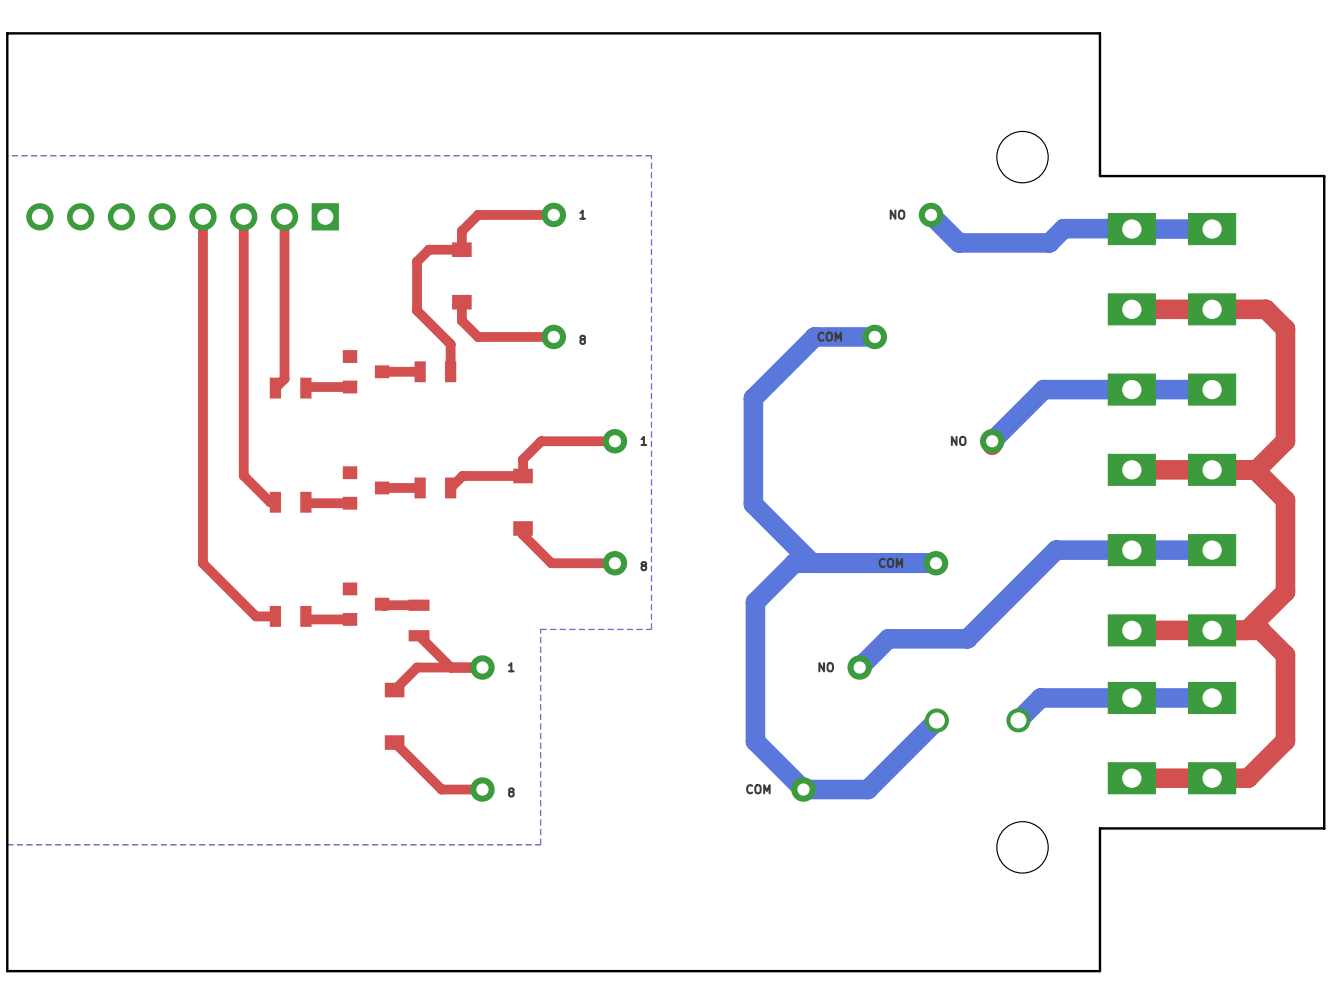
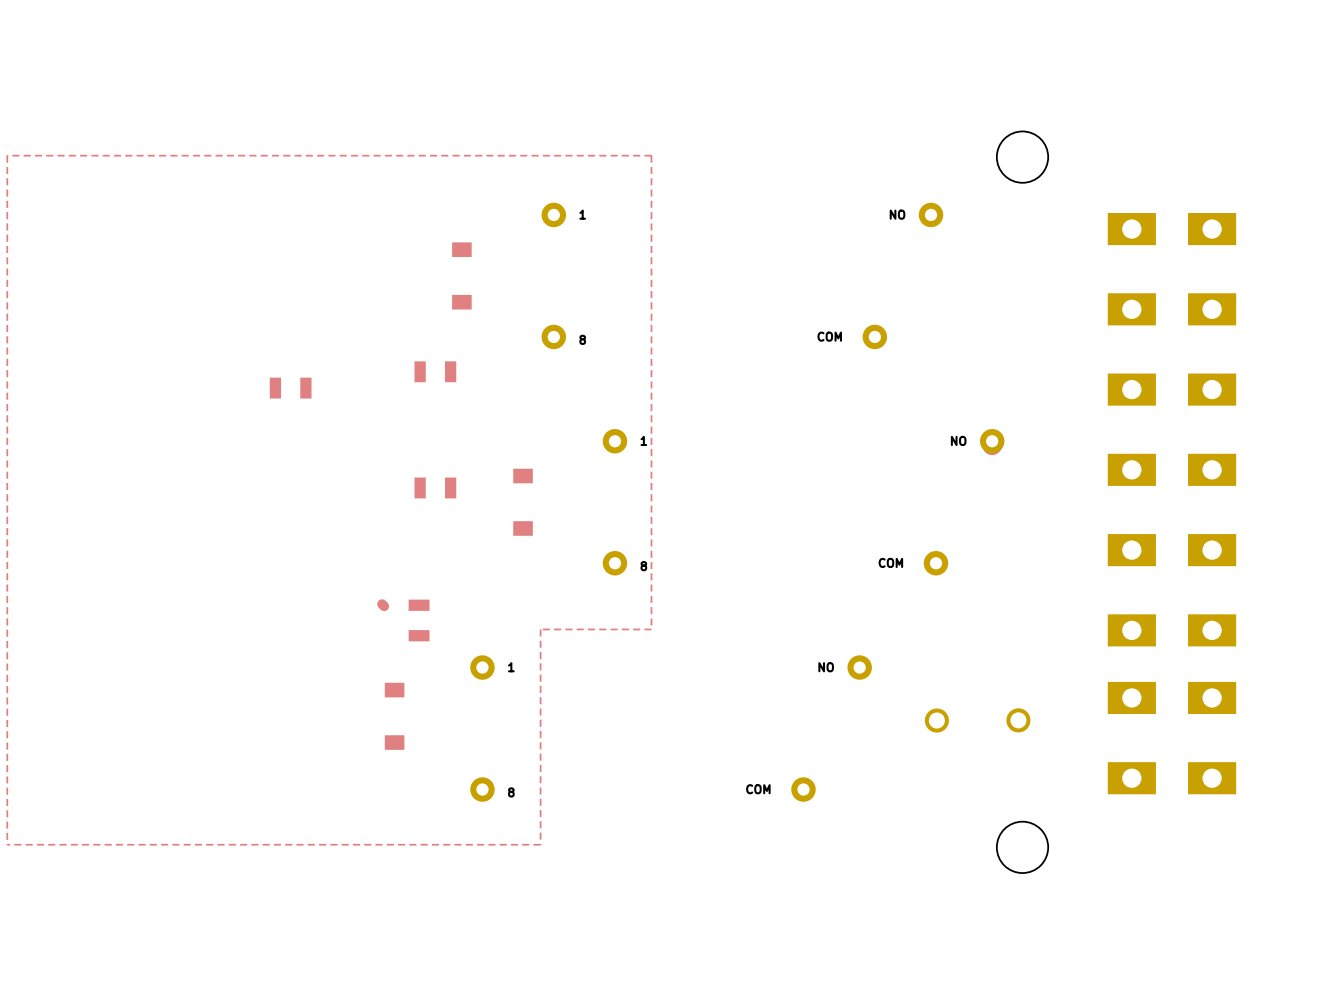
board edge: (1099, 33) (1099, 176) (1324, 176) (1324, 828) (1099, 828) (1099, 971) (7, 971) (7, 33) (1099, 33) -> none
bottom zone outline: (651, 155) (651, 629) (540, 629) (540, 844) (7, 844) (7, 155) (651, 155) -> none
top track: (551, 214) (478, 214) (461, 231) (461, 249) (429, 249) (417, 261) (417, 310) (450, 344) (450, 371) -> none
bottom track: (931, 214) (959, 242) (1049, 242) (1063, 228) (1212, 229) -> none
part: (182, 216) -> none
top track: (202, 216) (202, 563) (255, 616) (275, 616) -> none
top track: (243, 216) (243, 475) (270, 502) (275, 502) -> none
top track: (284, 216) (284, 378) (275, 388) -> none
top track: (461, 302) (461, 320) (478, 336) (551, 336) -> none
top track: (1131, 309) (1265, 309) (1285, 328) (1285, 441) (1256, 469) (1131, 469) -> none
bottom track: (874, 336) (814, 336) (753, 398) (753, 504) (812, 563) -> none
part: (366, 371) -> none
top track: (420, 371) (382, 371) -> none
top track: (350, 387) (305, 388) -> none
bottom track: (1212, 389) (1043, 389) (992, 441) -> none
top track: (614, 441) (541, 441) (523, 459) (523, 476) (462, 476) (450, 487) -> none
top track: (1255, 469) (1285, 500) (1285, 591) (1247, 630) -> none
part: (366, 487) -> none
top track: (420, 487) (382, 487) -> none
part: (290, 502) -> none
top track: (305, 502) (350, 503) -> none
top track: (523, 528) (523, 534) (551, 563) (614, 563) -> none
bottom track: (1212, 550) (1056, 550) (967, 638) (888, 638) (859, 667) -> none
bottom track: (936, 563) (794, 563) (755, 602) (755, 741) (803, 789) (867, 789) (936, 720) -> none
part: (366, 604) -> none
top track: (419, 605) (383, 605) -> none
part: (290, 616) -> none
top track: (305, 616) (308, 619) (350, 619) -> none
top track: (1131, 630) (1260, 630) (1285, 655) (1285, 740) (1248, 778) (1131, 778) -> none
top track: (419, 635) (450, 667) -> none
top track: (482, 667) (417, 667) (394, 690) -> none
bottom track: (1212, 697) (1040, 697) (1018, 720) -> none
top track: (394, 742) (441, 789) (482, 789) -> none

